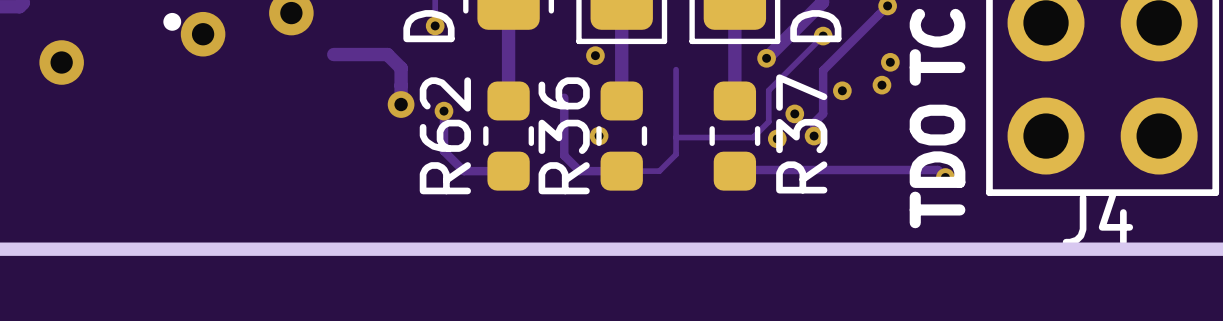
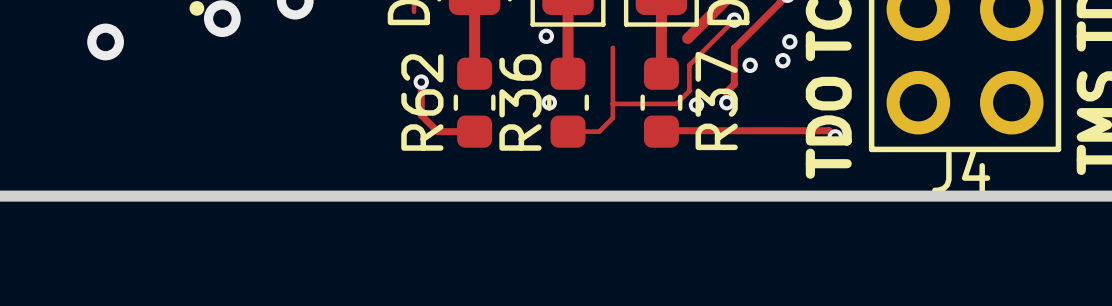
via: (435, 25) -> none
track: (333, 54) (387, 54) (401, 68) (401, 104) -> none
via: (766, 58) -> none
track: (564, 97) (564, 155) (579, 171) (621, 171) -> none
via: (401, 104) -> none
via: (794, 113) -> none

